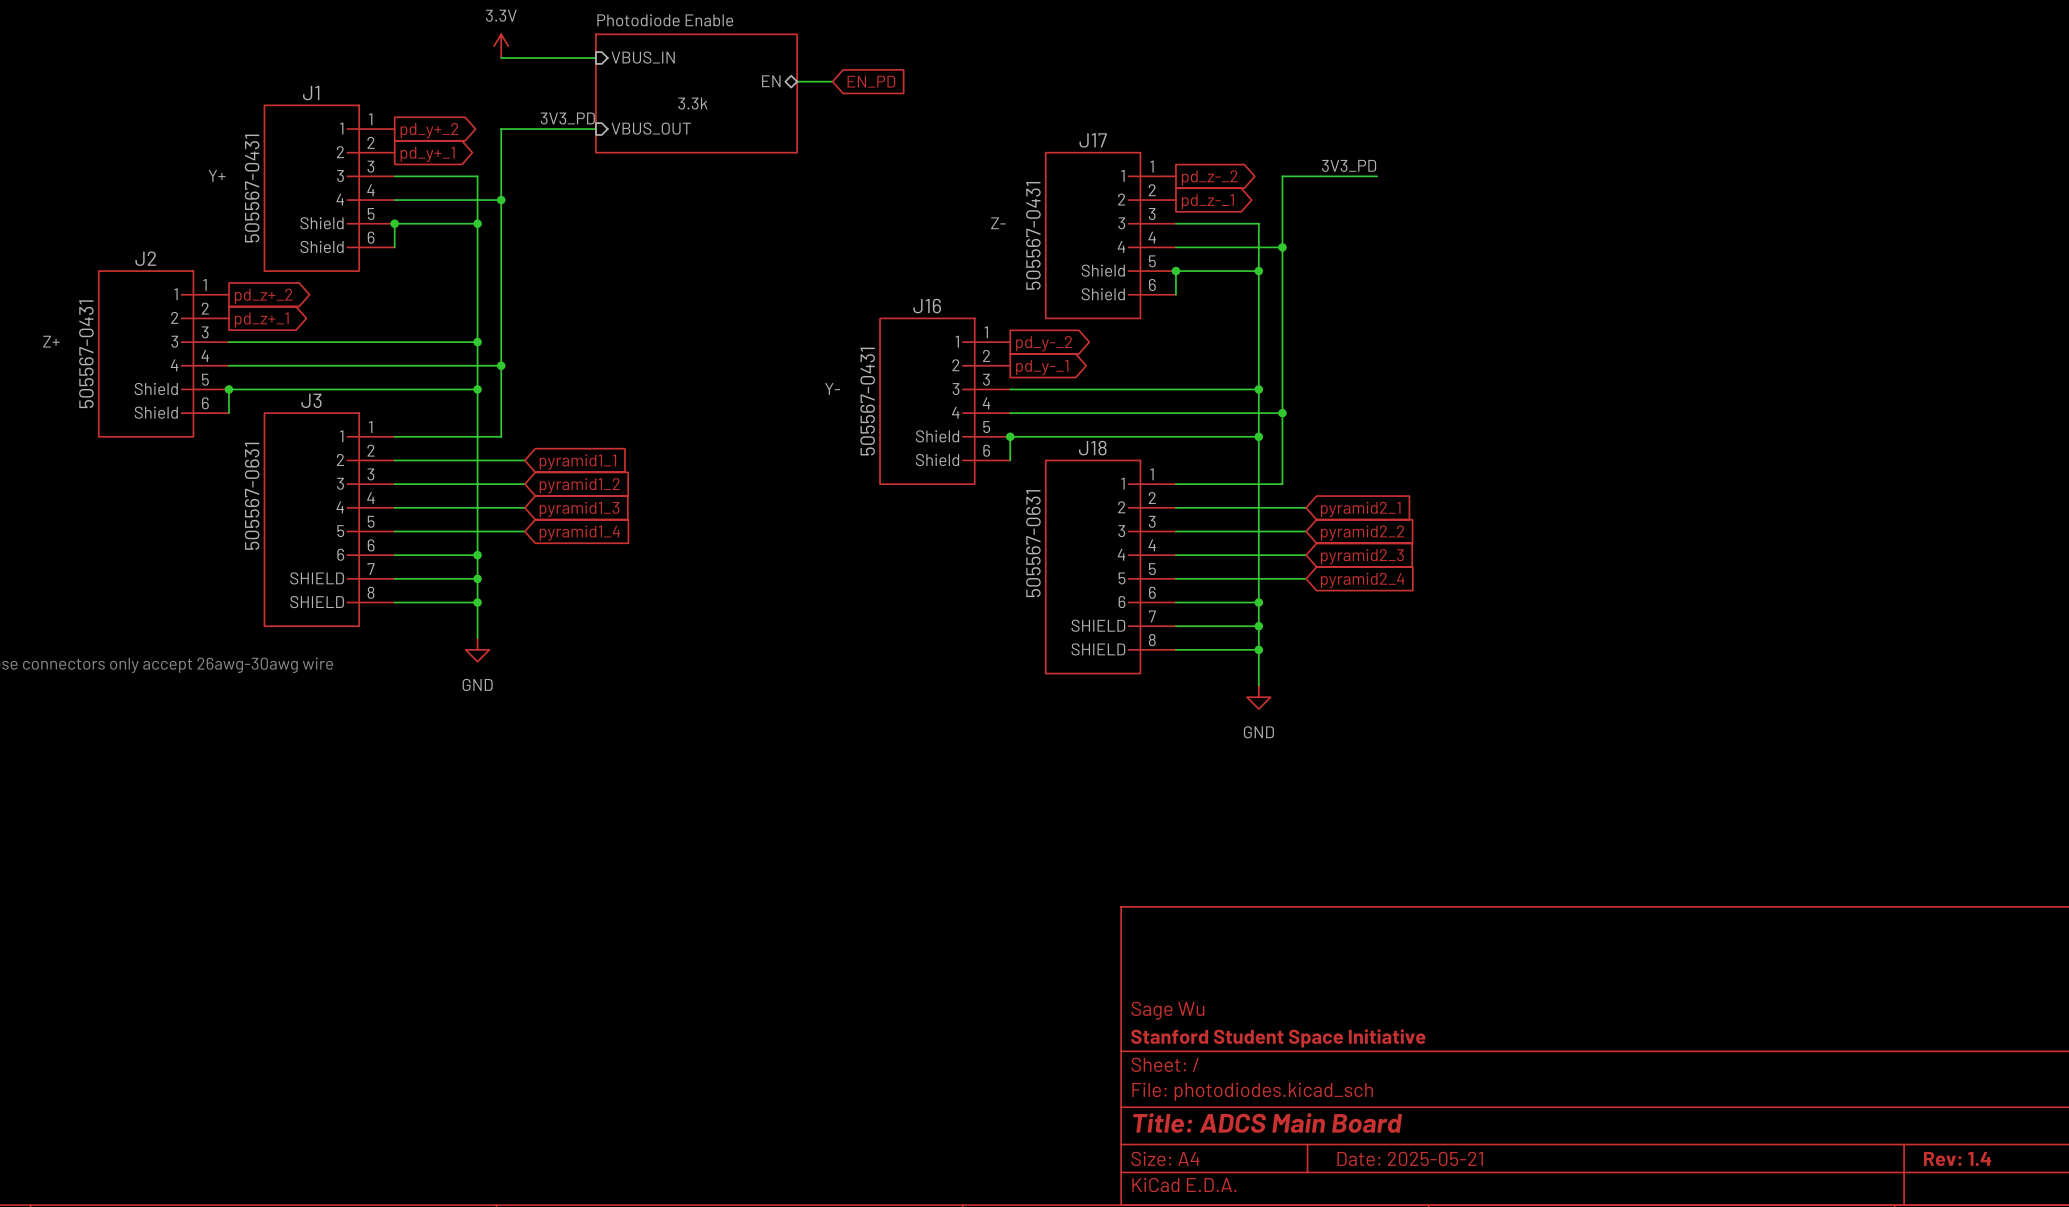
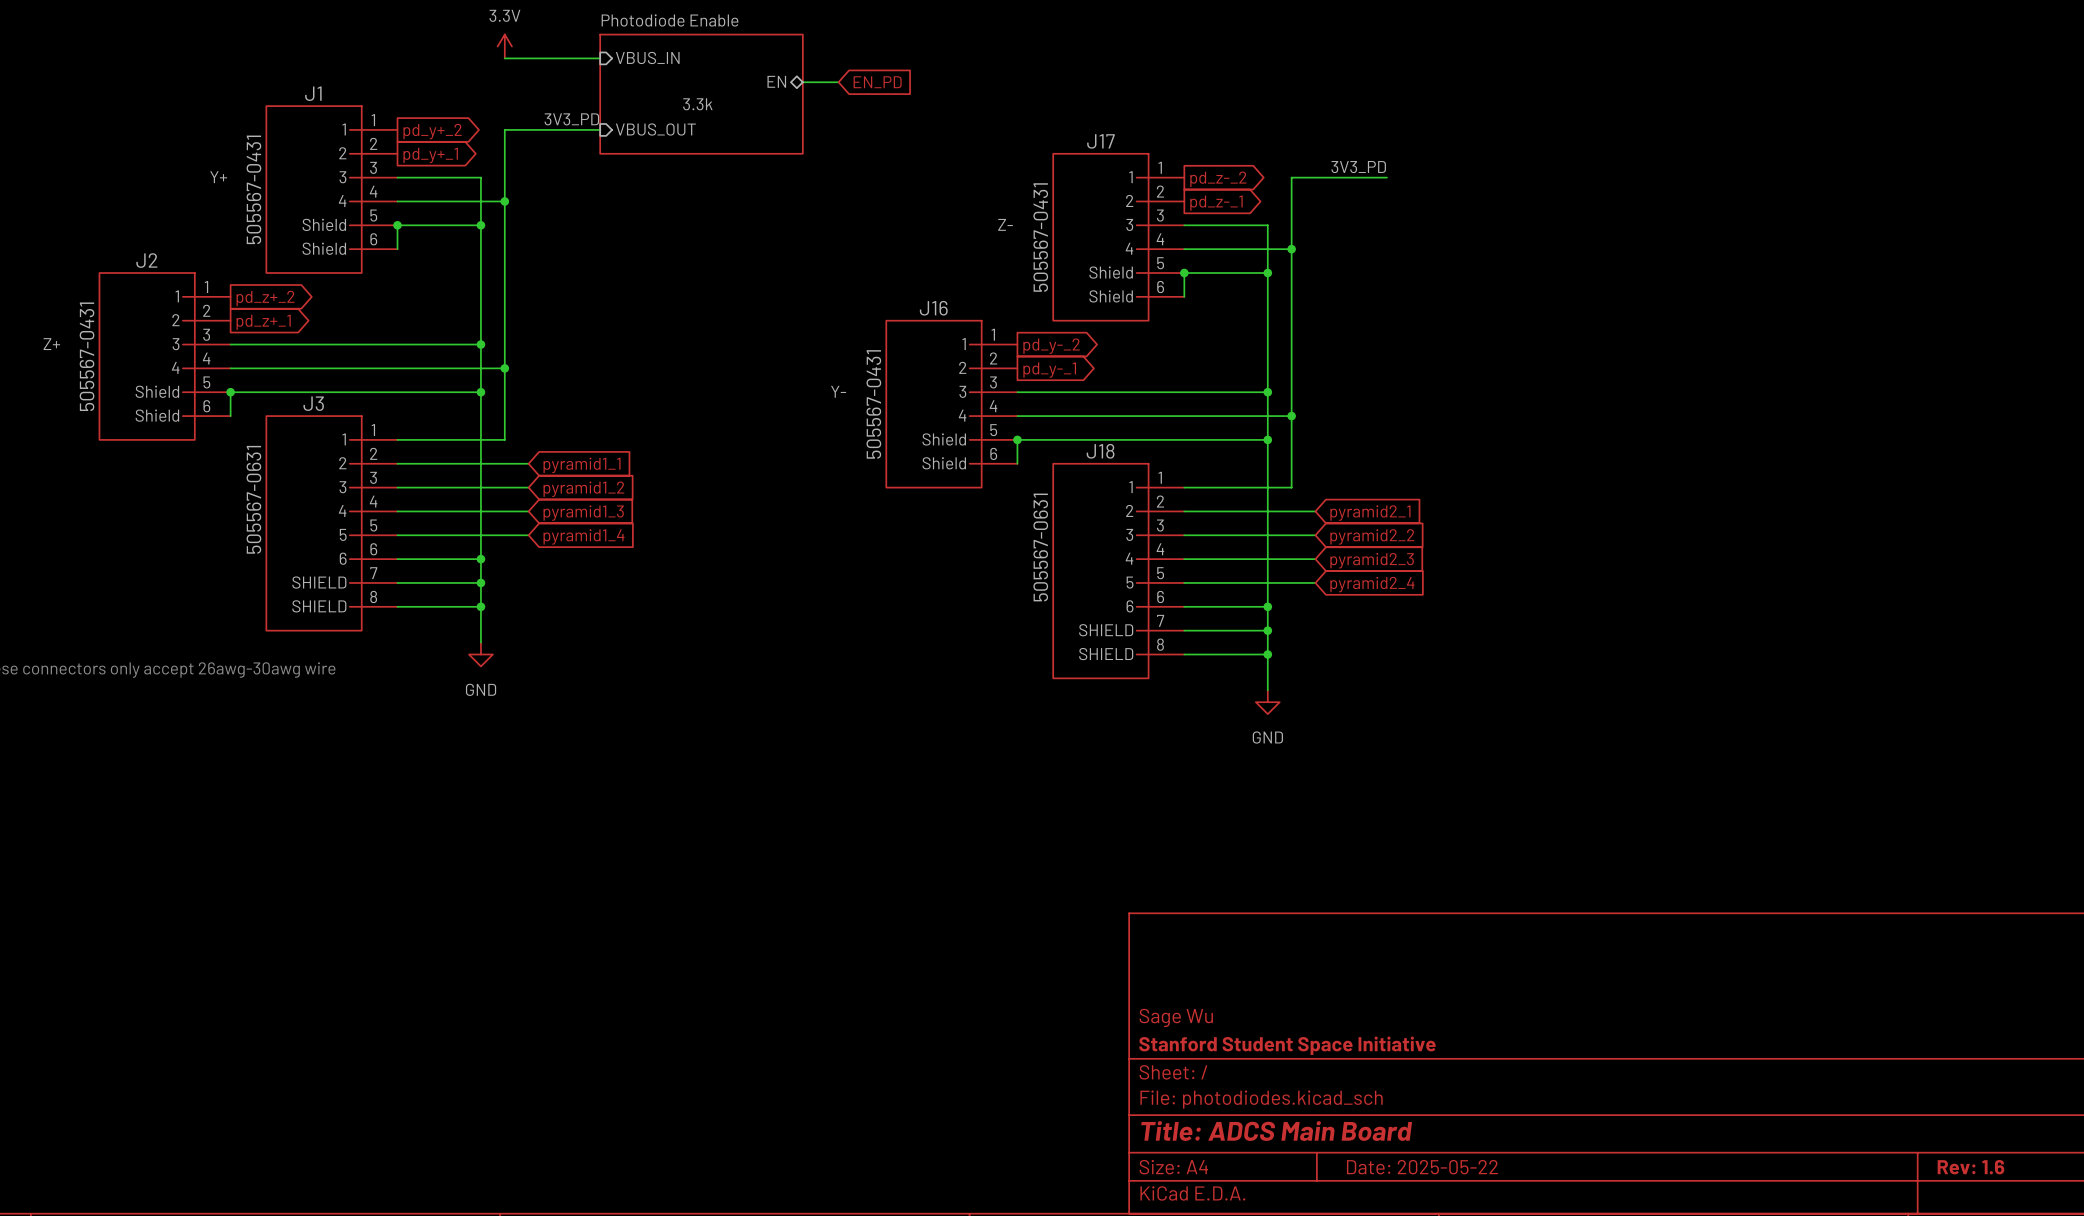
title block: Date: 2025-05-21 (1410, 1158) -> Date: 2025-05-22 (1422, 1167)
title block: Rev: 1.4 (1957, 1158) -> Rev: 1.6 (1970, 1167)

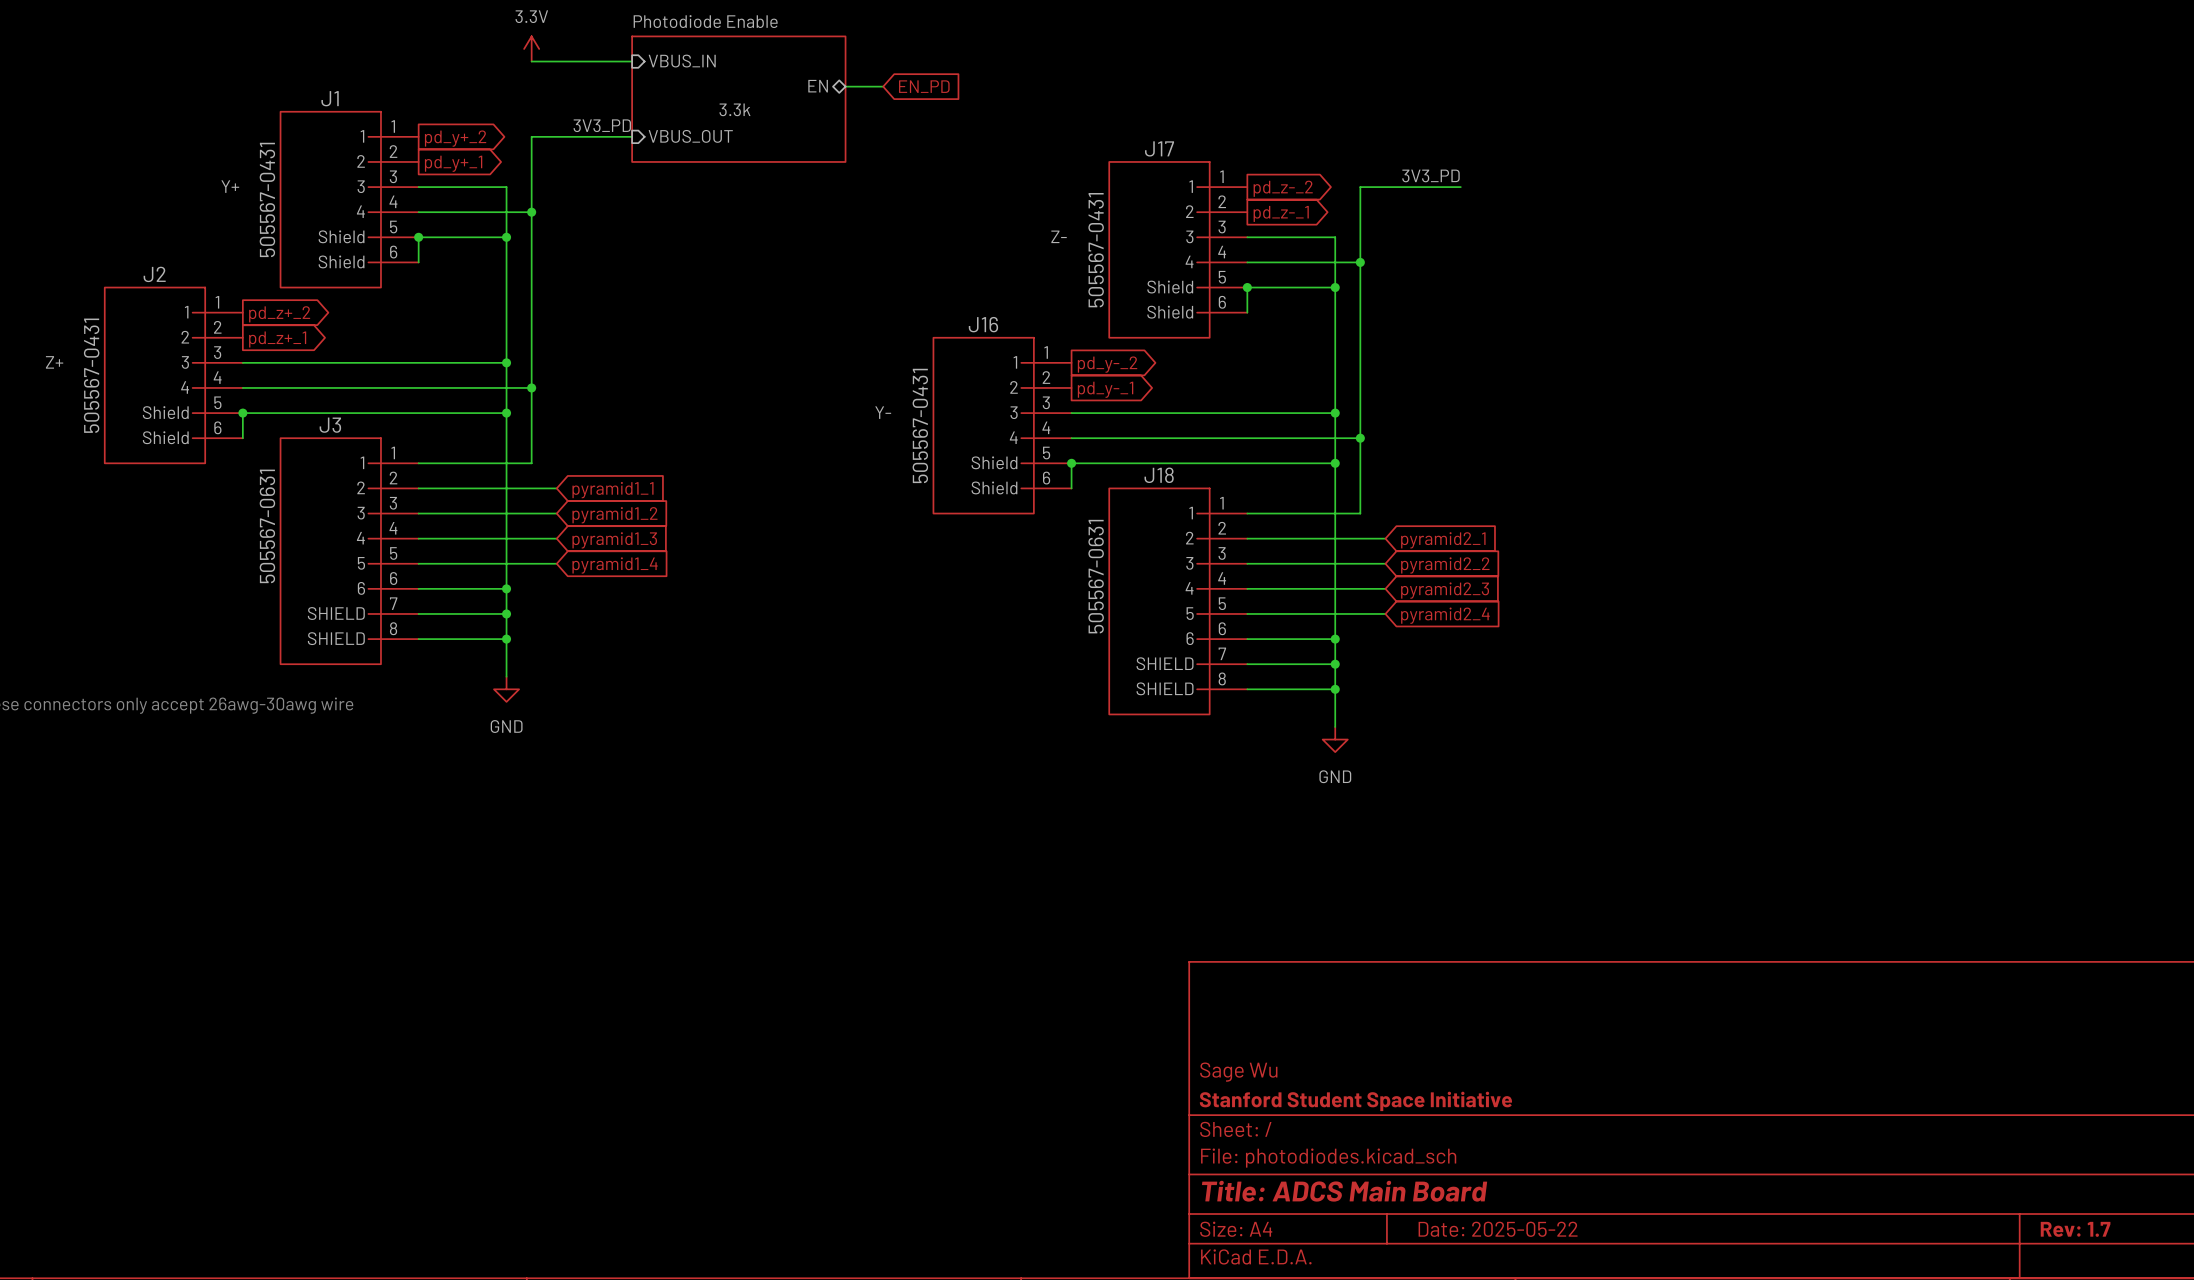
title block: Rev: 1.6 (1970, 1167) -> Rev: 1.7 (2075, 1229)

